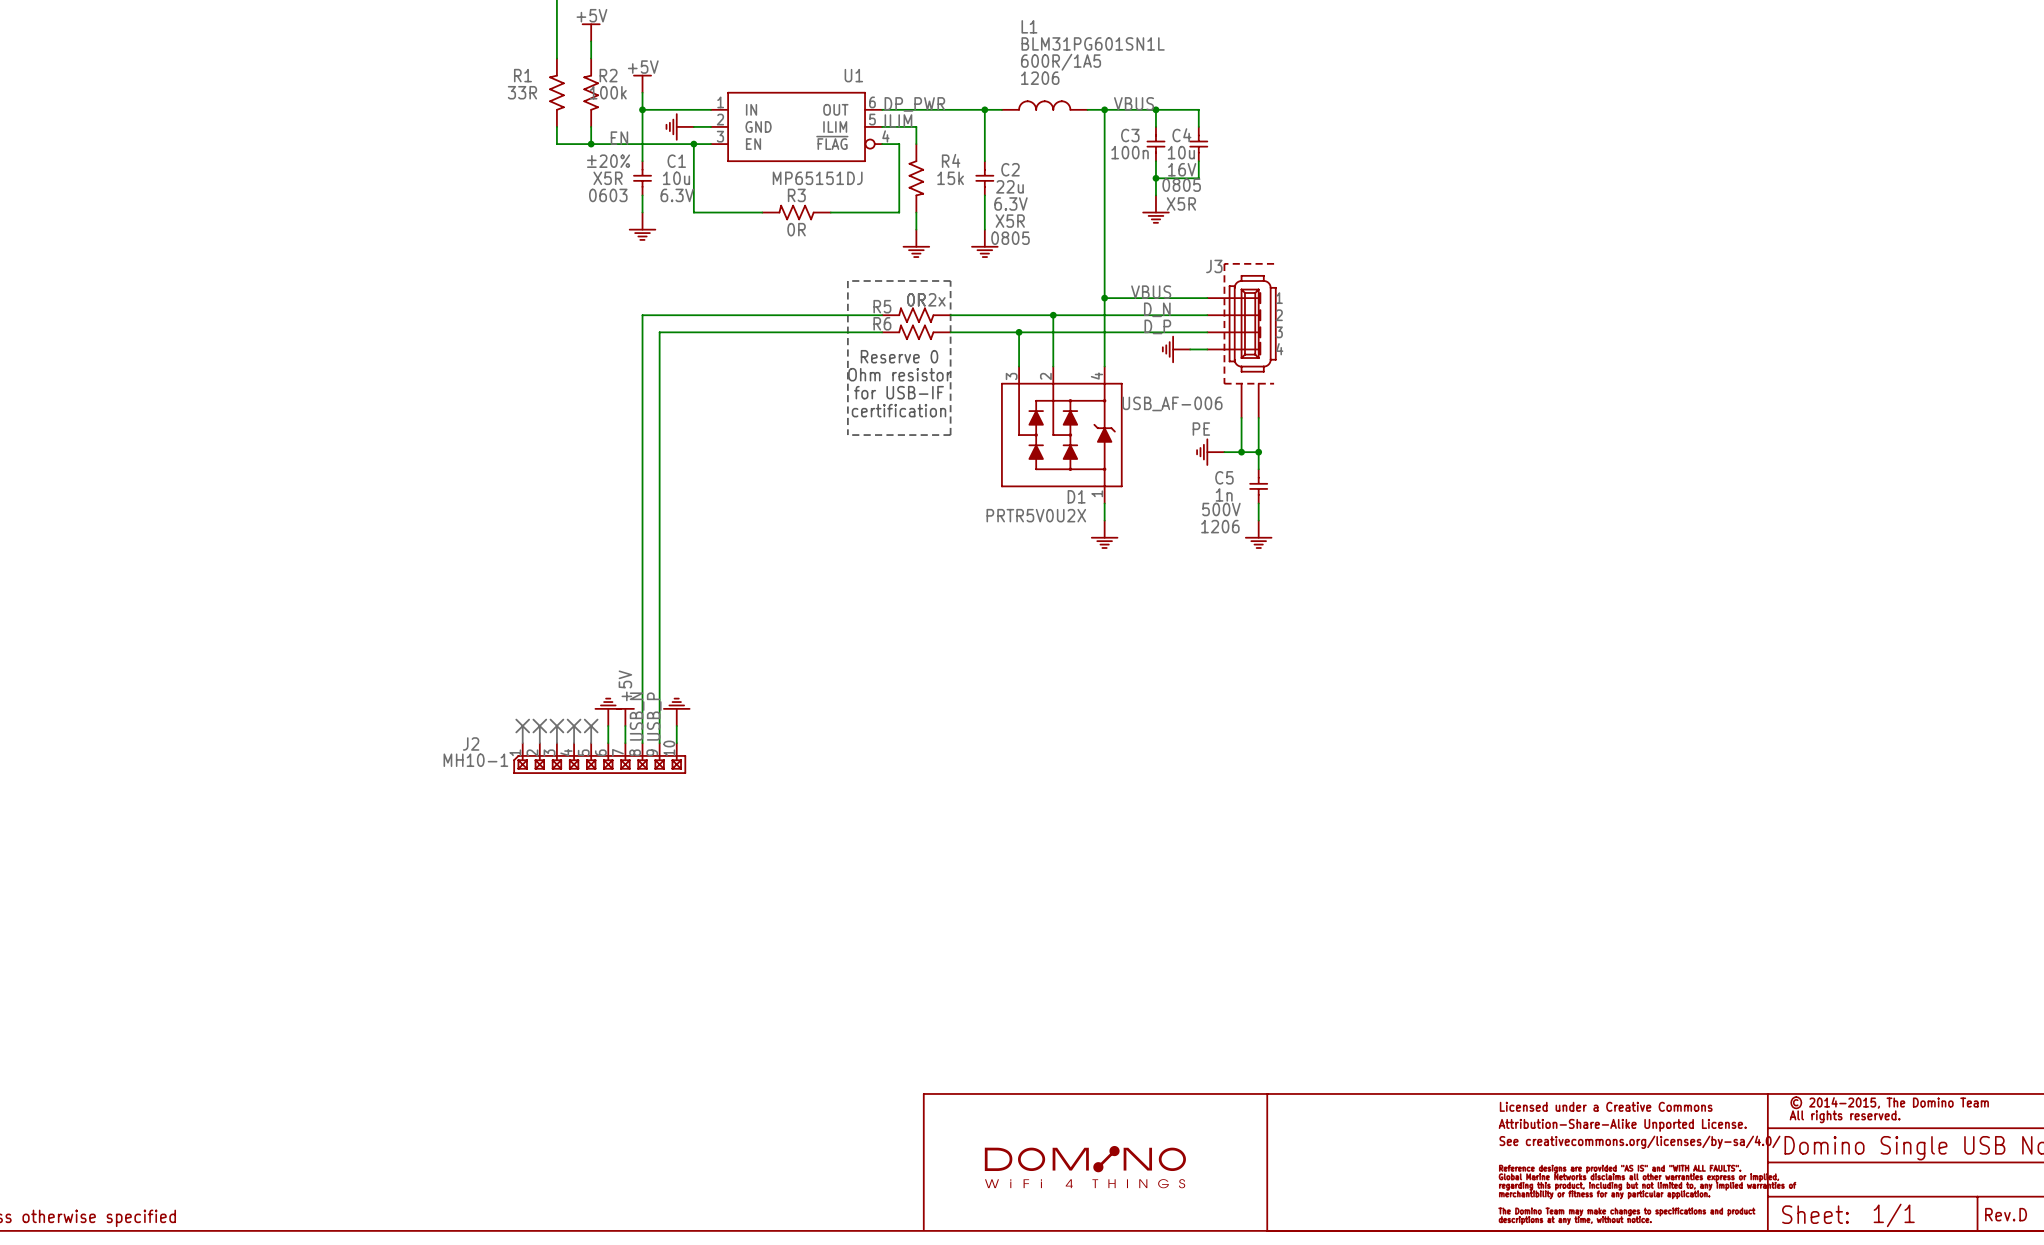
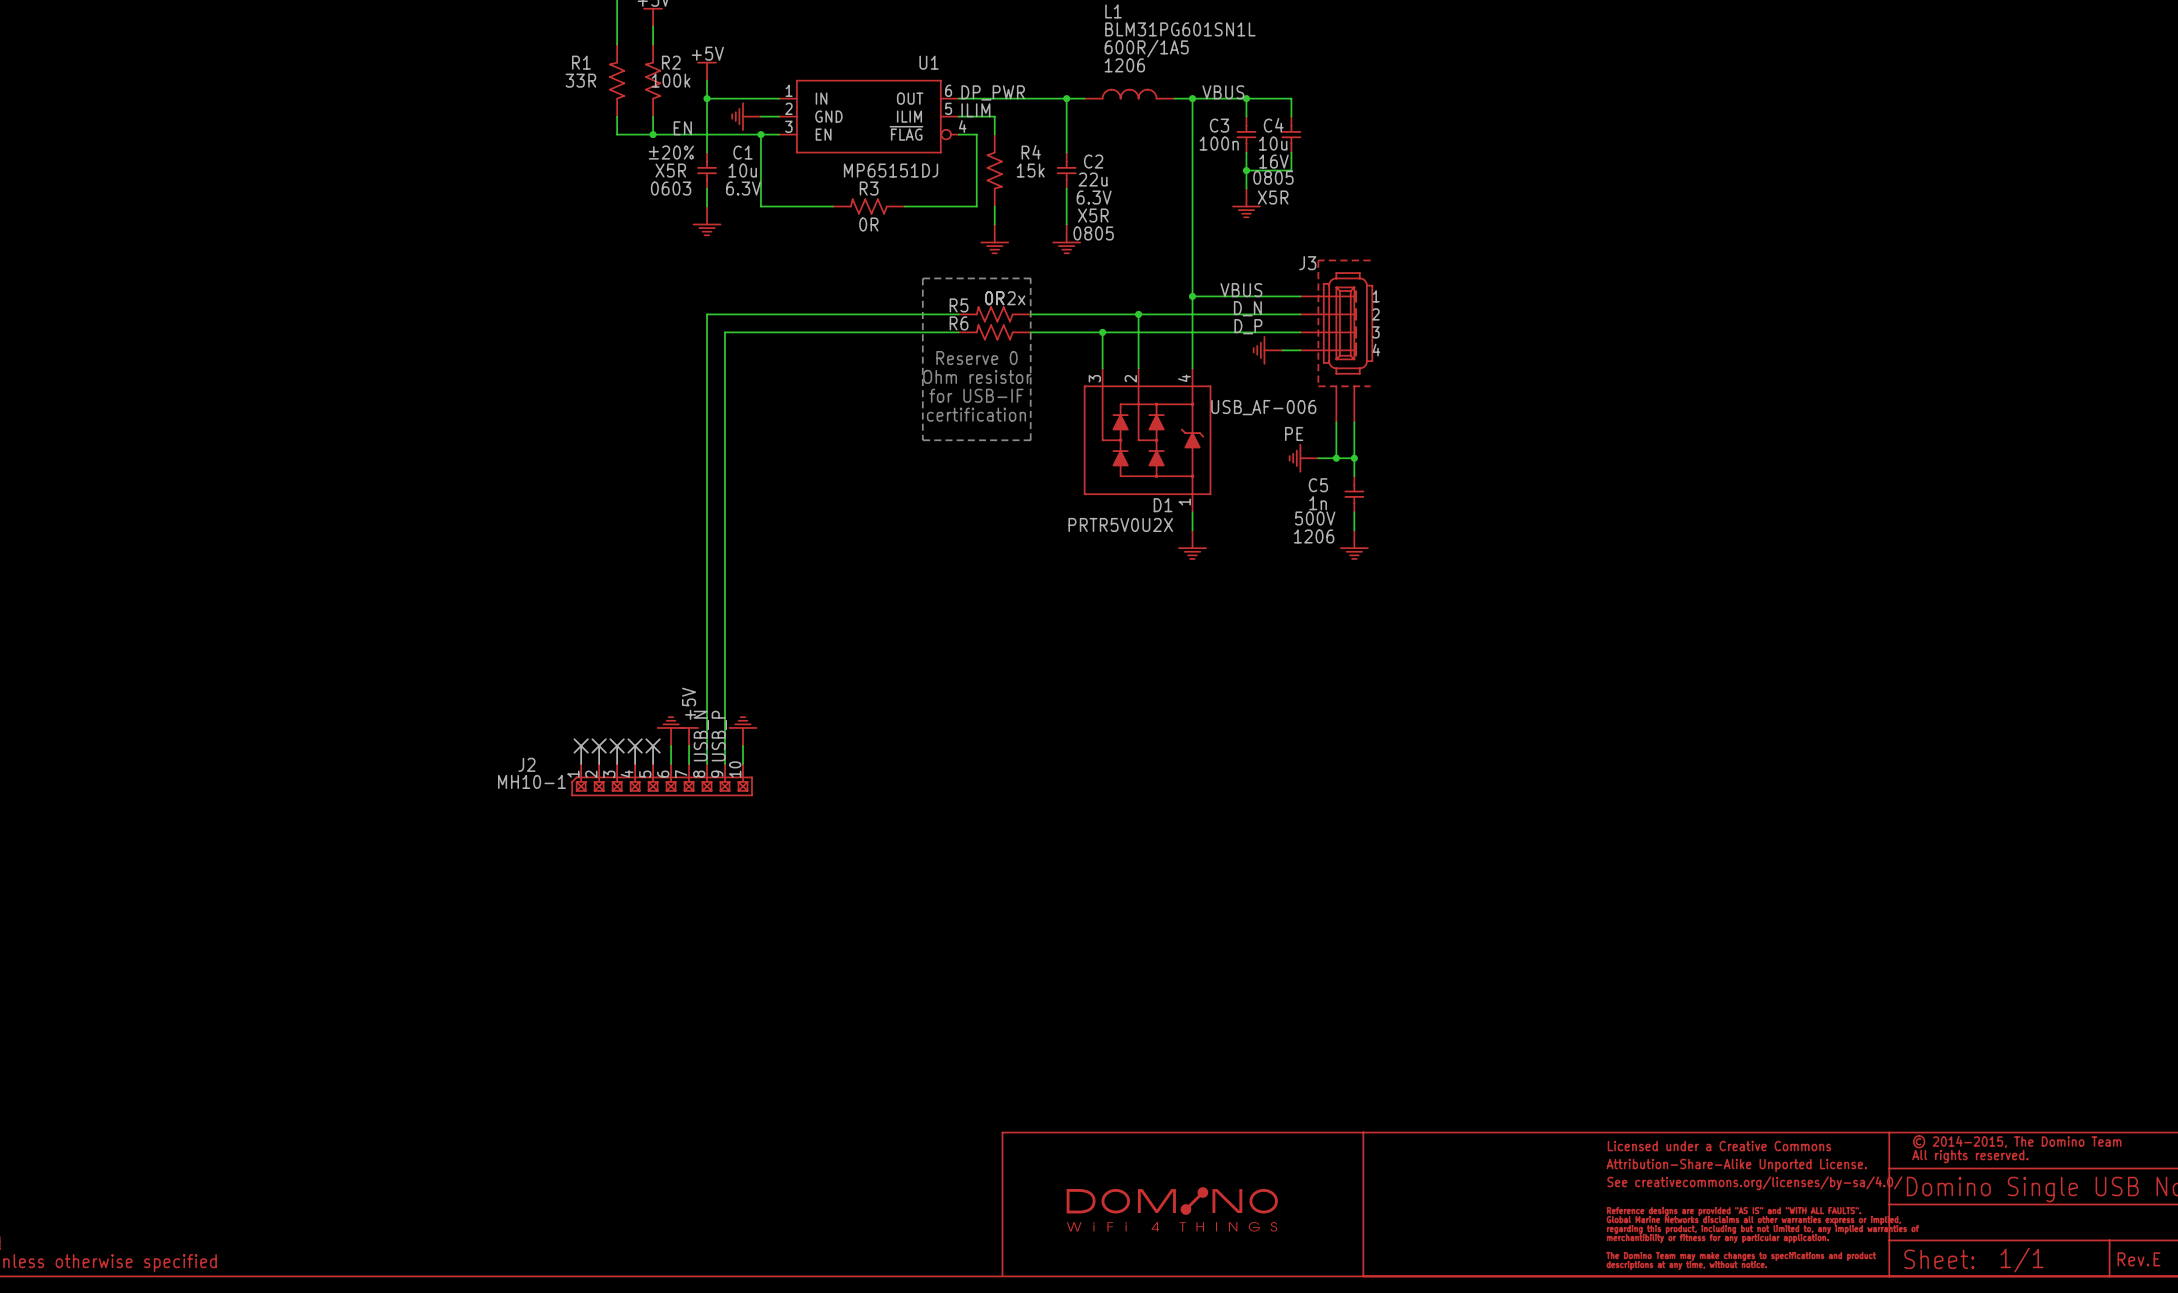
text: D (2023, 1214) -> E (2156, 1259)

